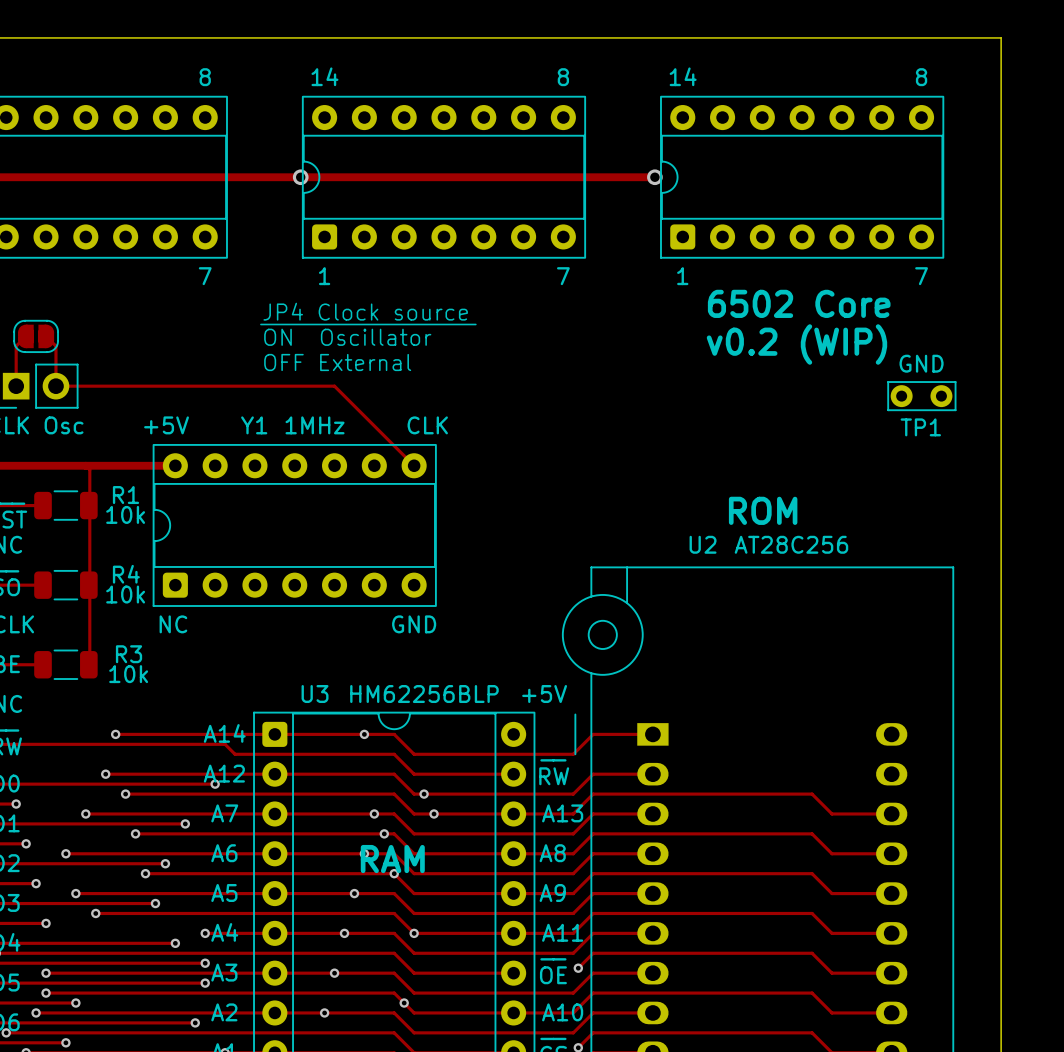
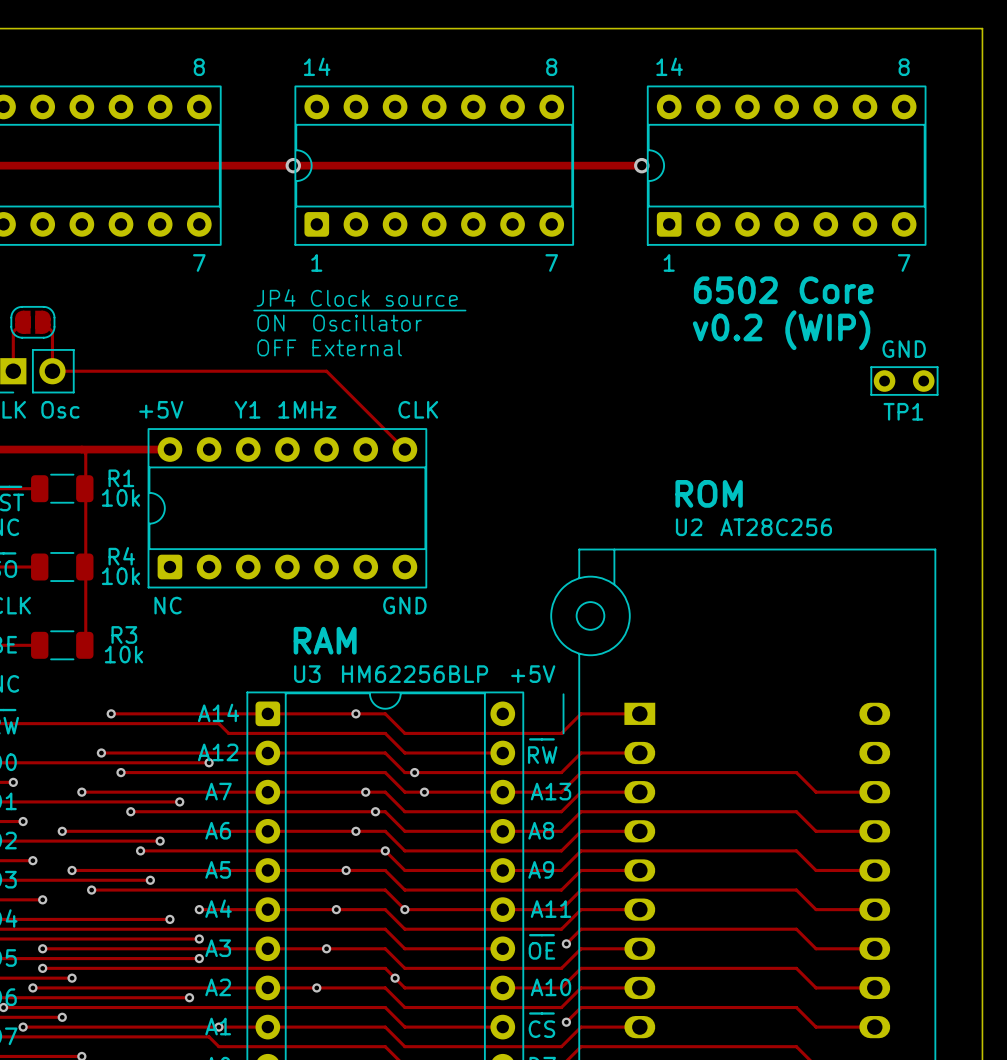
text position: ROM (763, 510) -> ROM (709, 493)
text position: RAM (392, 859) -> RAM (325, 640)

